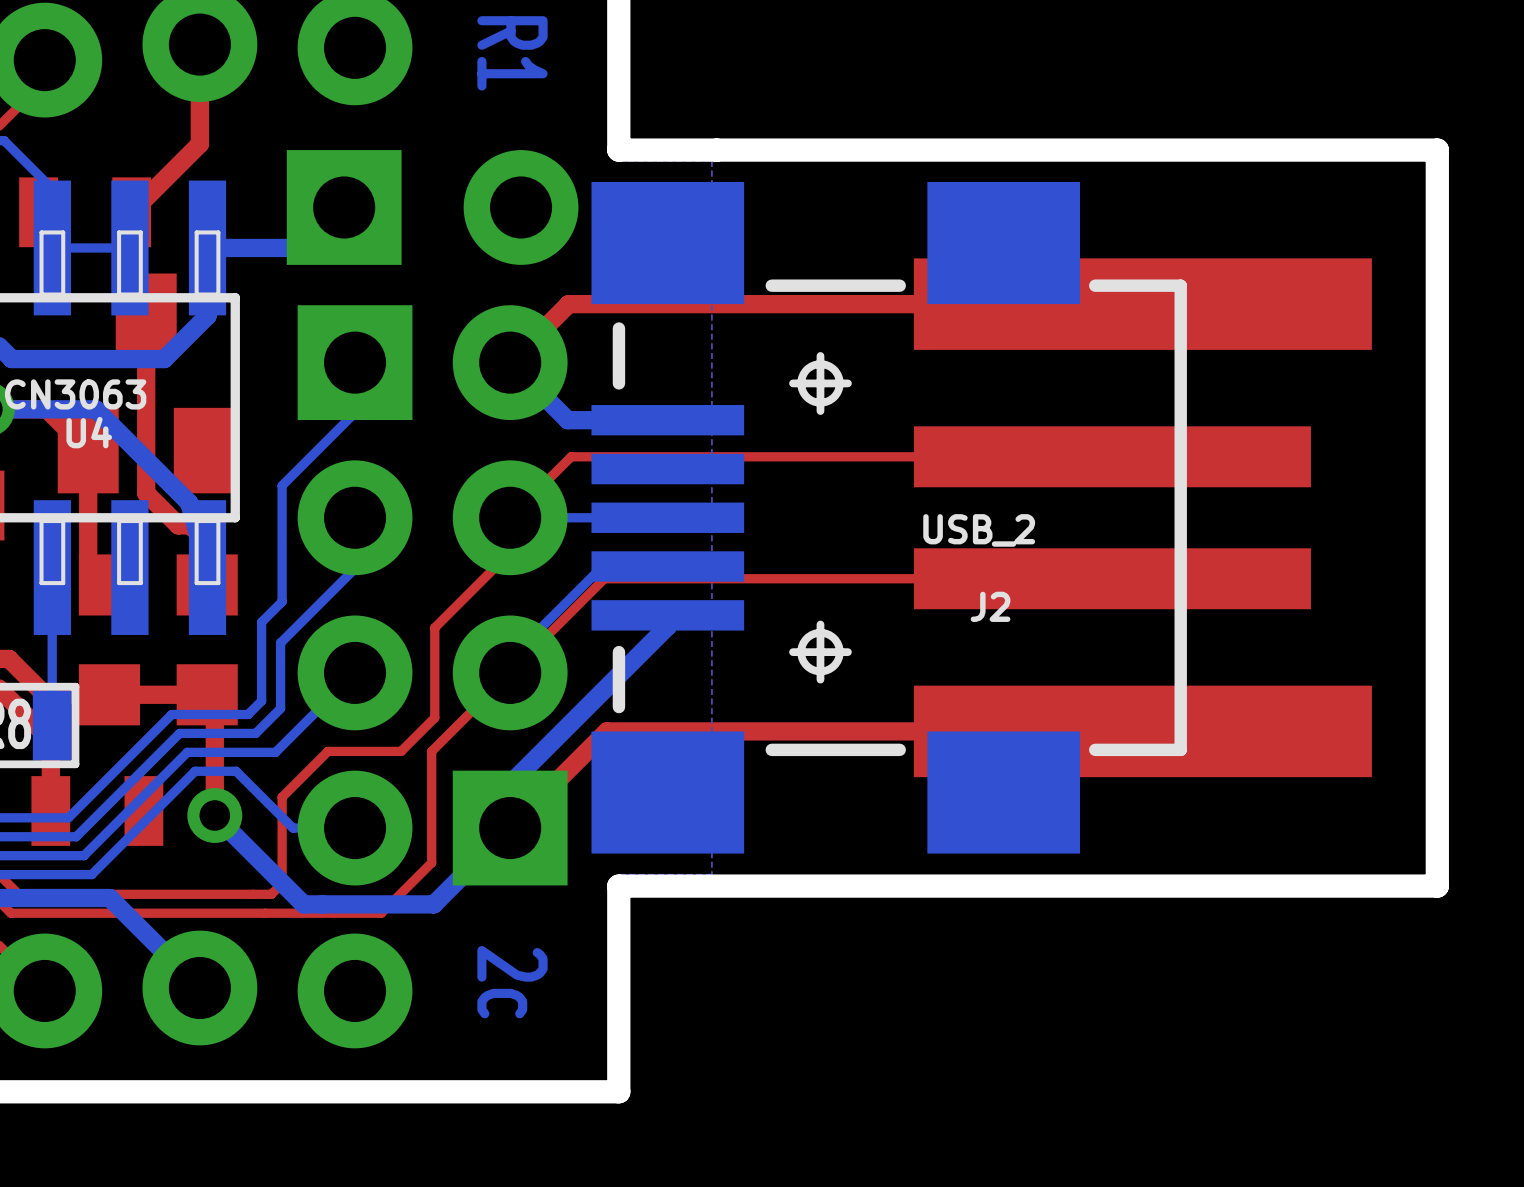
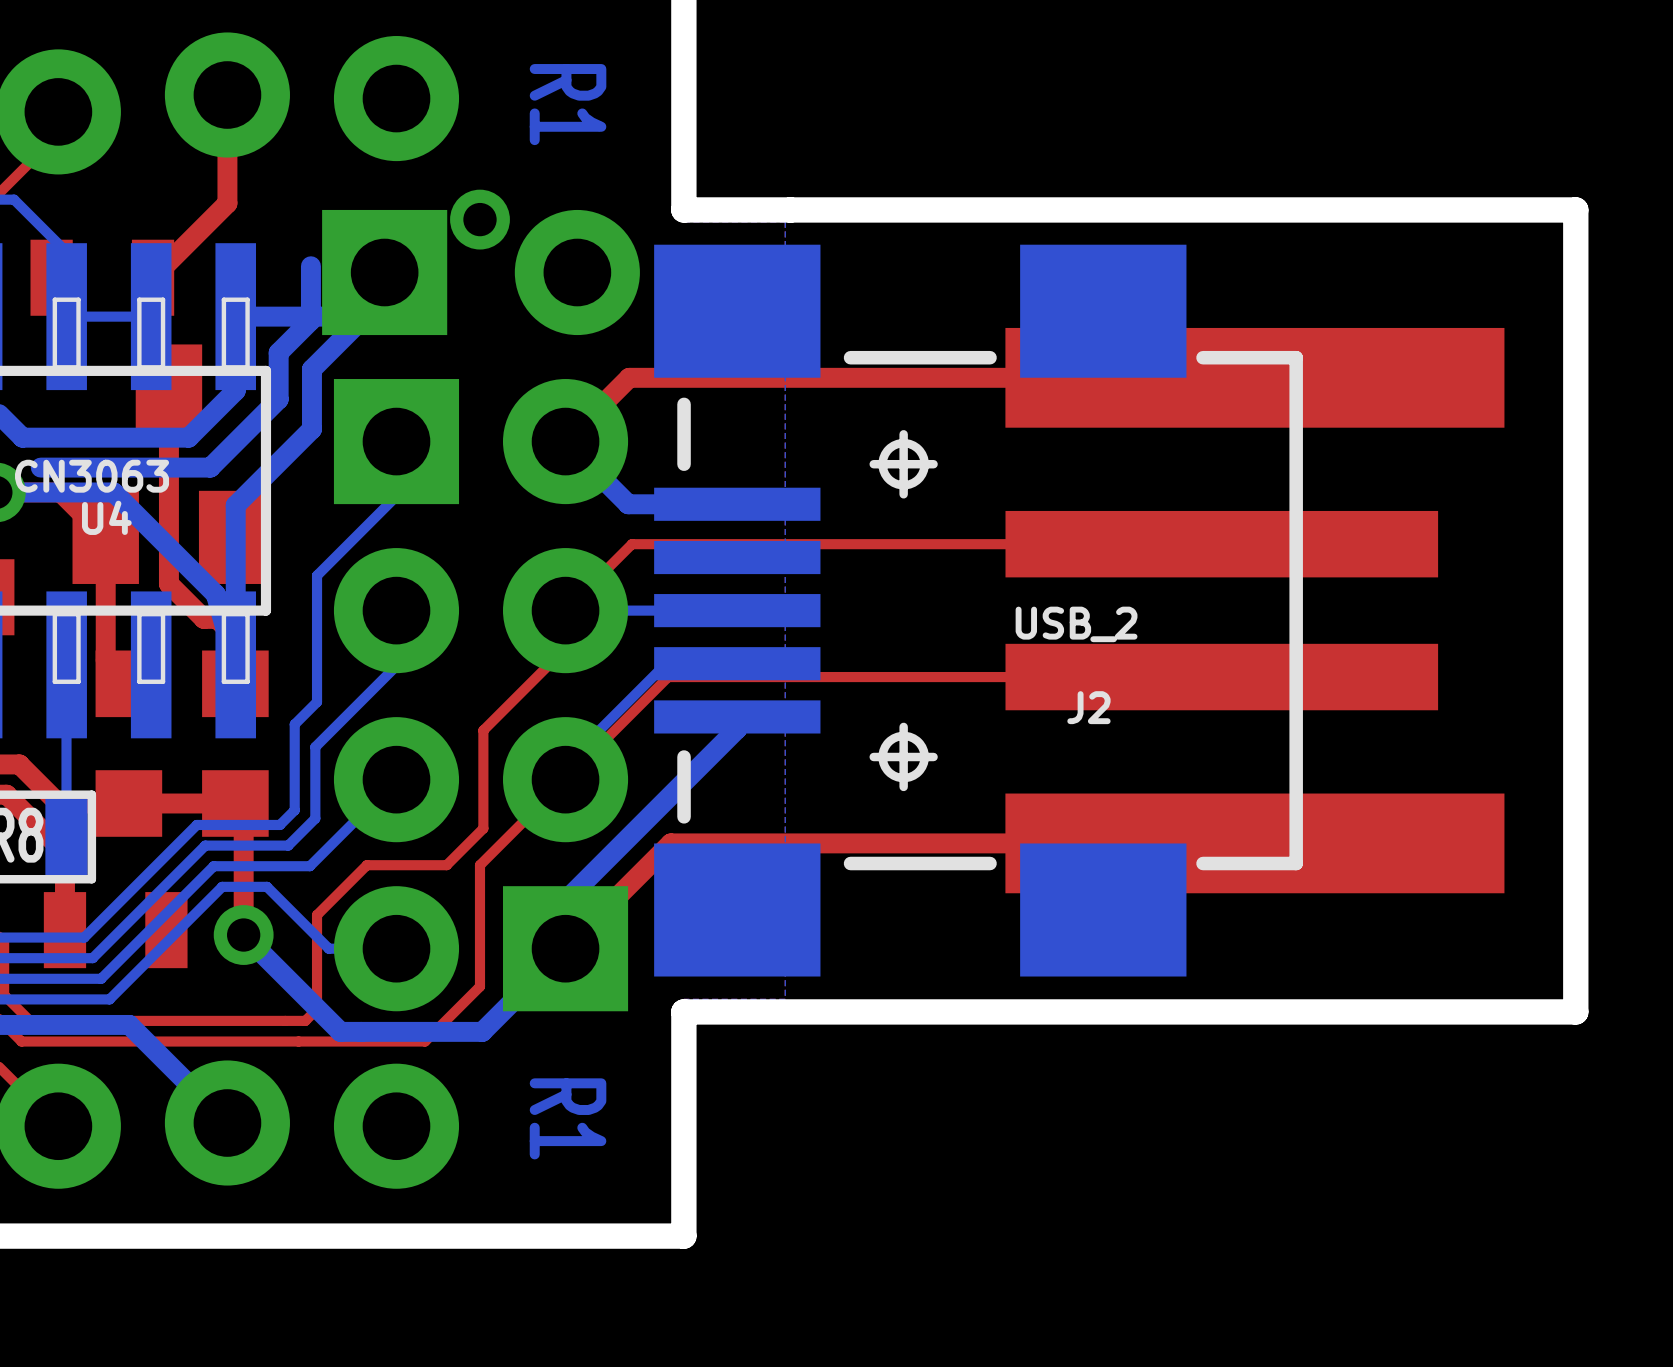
via: none -> (480, 219)
bottom track: none -> (310, 266) (310, 320) (278, 352) (278, 399) (210, 467) (40, 467)
bottom track: none -> (370, 266) (370, 311) (311, 369) (311, 429) (235, 505) (235, 664)
text: 2c (512, 982) -> R1 (568, 1118)

